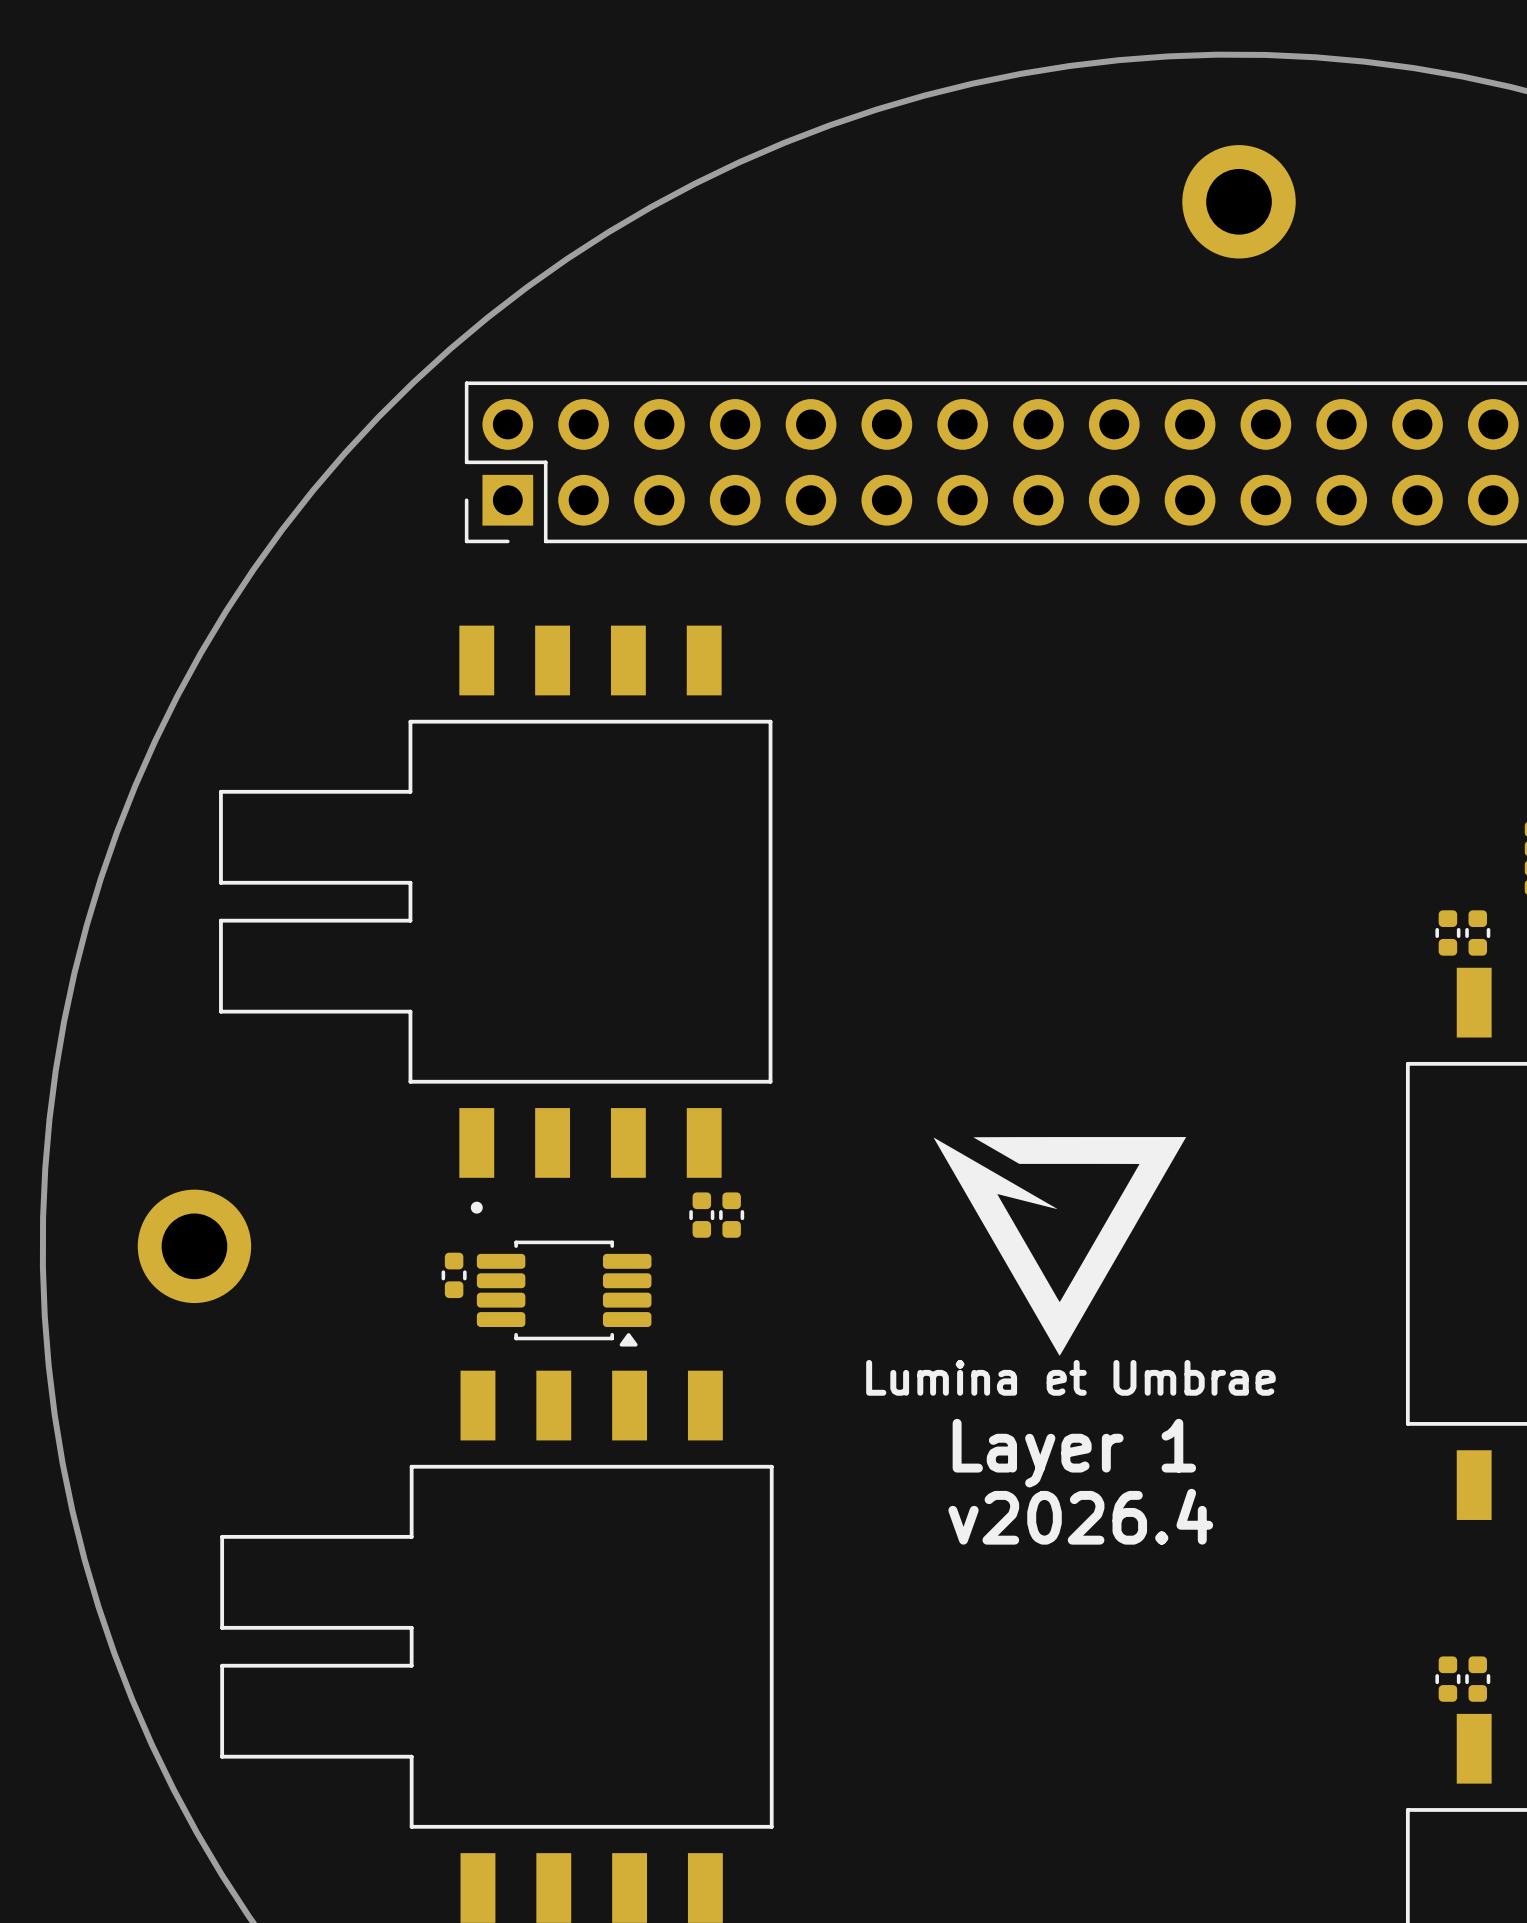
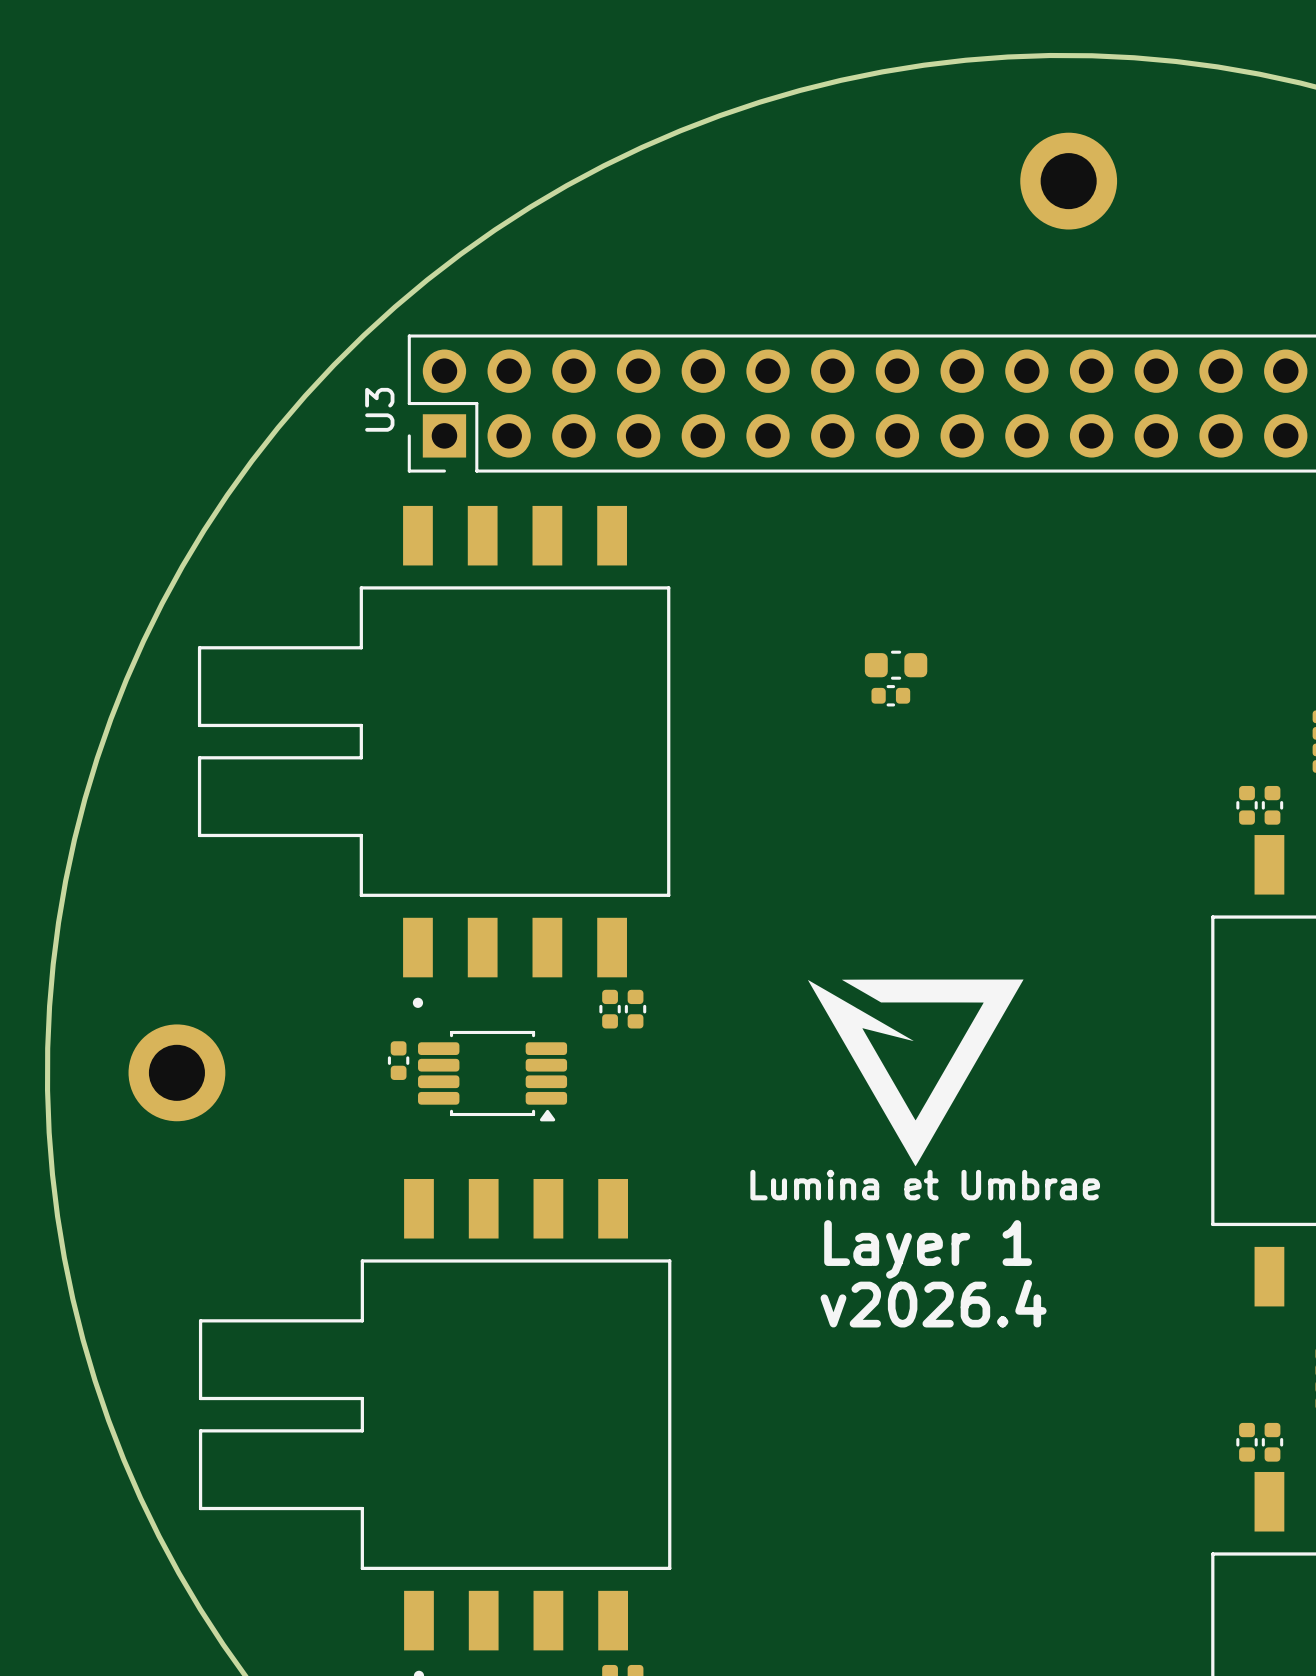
U3 name: none -> U3 (379, 409)
part: none -> (896, 665)
part: none -> (890, 695)
part position: (495, 919) -> (434, 756)
part: none -> (610, 1009)
part: none -> (635, 1009)
part: (701, 1215) -> none
part: (731, 1215) -> none
part position: (454, 1275) -> (398, 1060)
part position: (564, 1293) -> (492, 1076)

